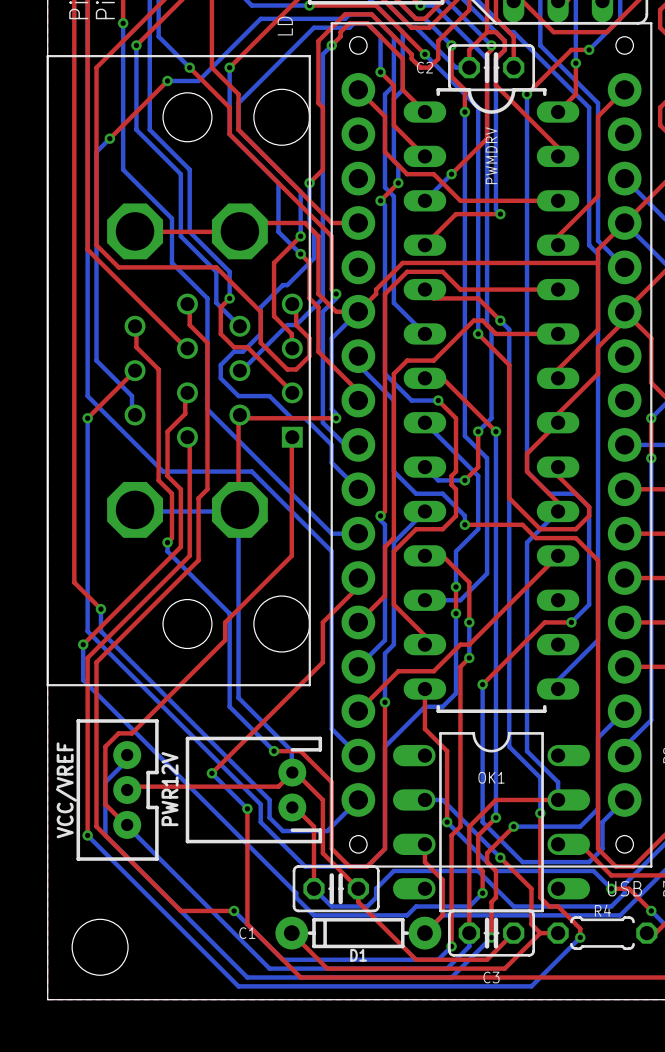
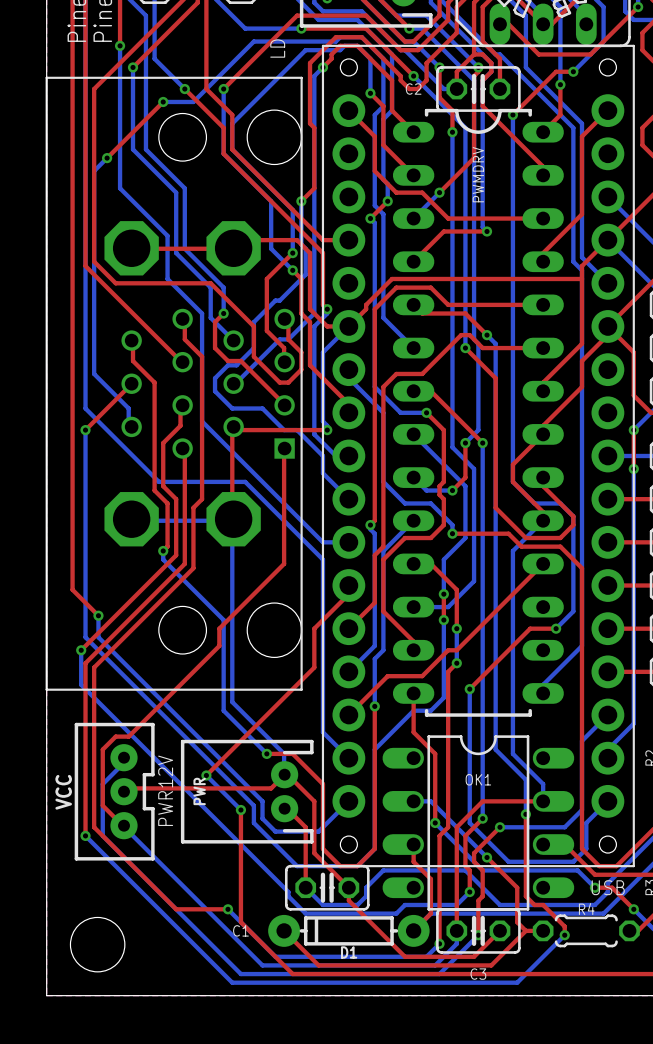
PWR12V name: PWR12V (170, 789) -> PWR (199, 791)
text: none -> PWR12V (165, 790)
VCC/VREF name: VCC/VREF (66, 790) -> VCC (63, 792)

